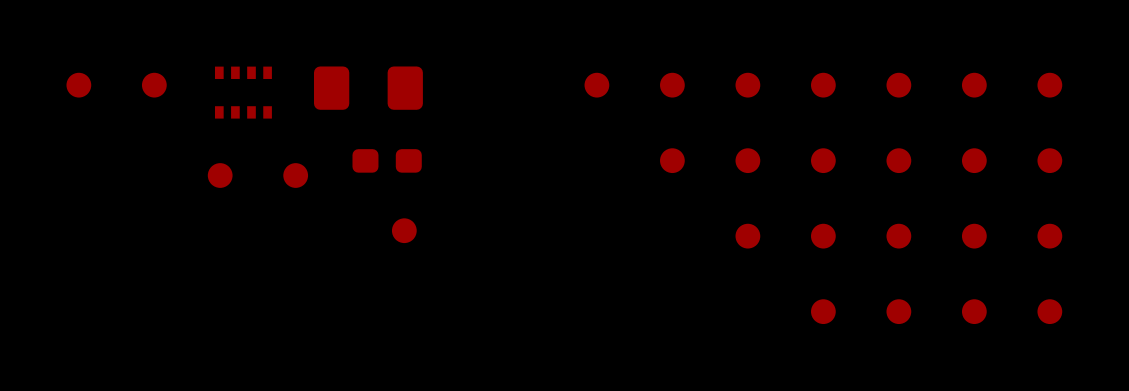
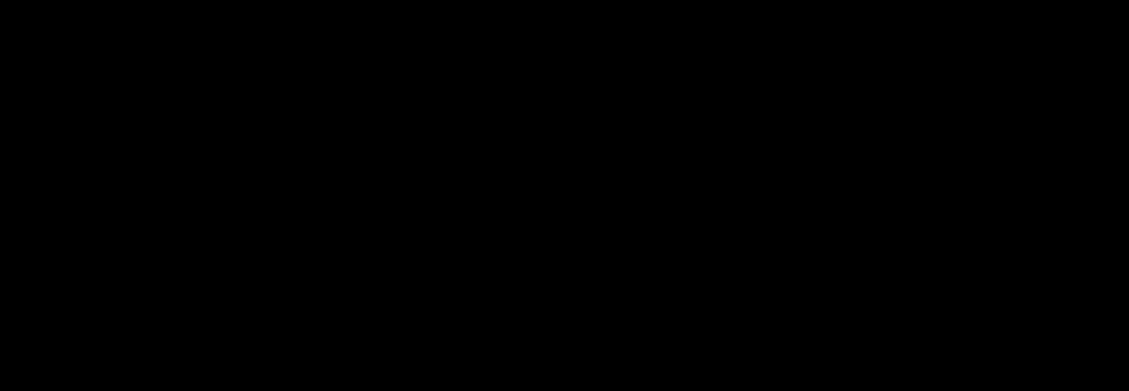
part: (78, 85) -> none
part: (154, 85) -> none
part: (596, 85) -> none
part: (672, 85) -> none
part: (747, 85) -> none
part: (823, 85) -> none
part: (898, 85) -> none
part: (974, 85) -> none
part: (1049, 85) -> none
part: (368, 88) -> none
part: (243, 92) -> none
part: (387, 160) -> none
part: (672, 160) -> none
part: (747, 160) -> none
part: (823, 160) -> none
part: (898, 160) -> none
part: (974, 160) -> none
part: (1049, 160) -> none
part: (220, 175) -> none
part: (295, 175) -> none
part: (404, 230) -> none
part: (747, 236) -> none
part: (823, 236) -> none
part: (898, 236) -> none
part: (974, 236) -> none
part: (1049, 236) -> none
part: (823, 311) -> none
part: (898, 311) -> none
part: (974, 311) -> none
part: (1049, 311) -> none

